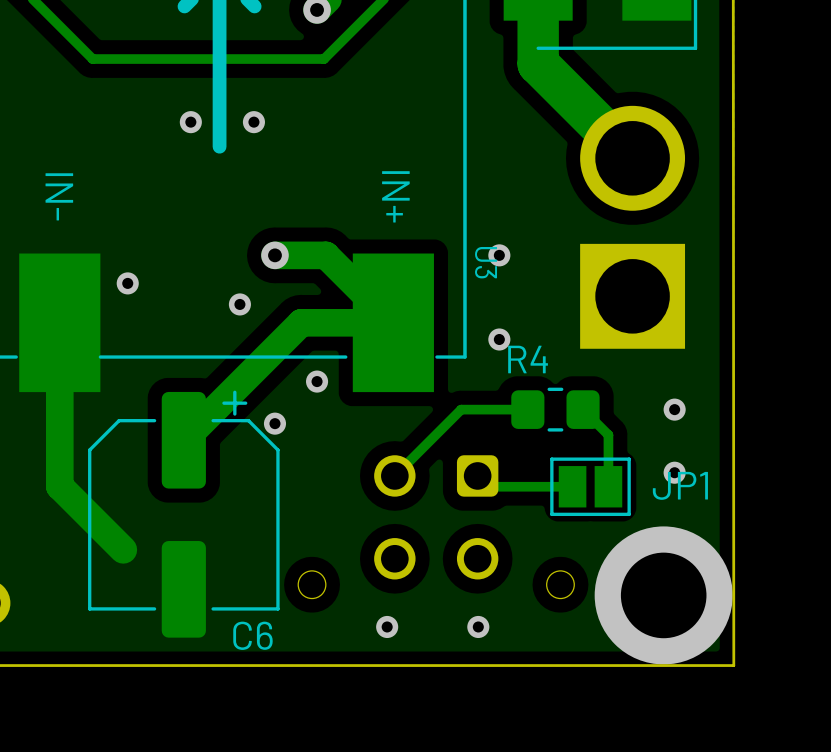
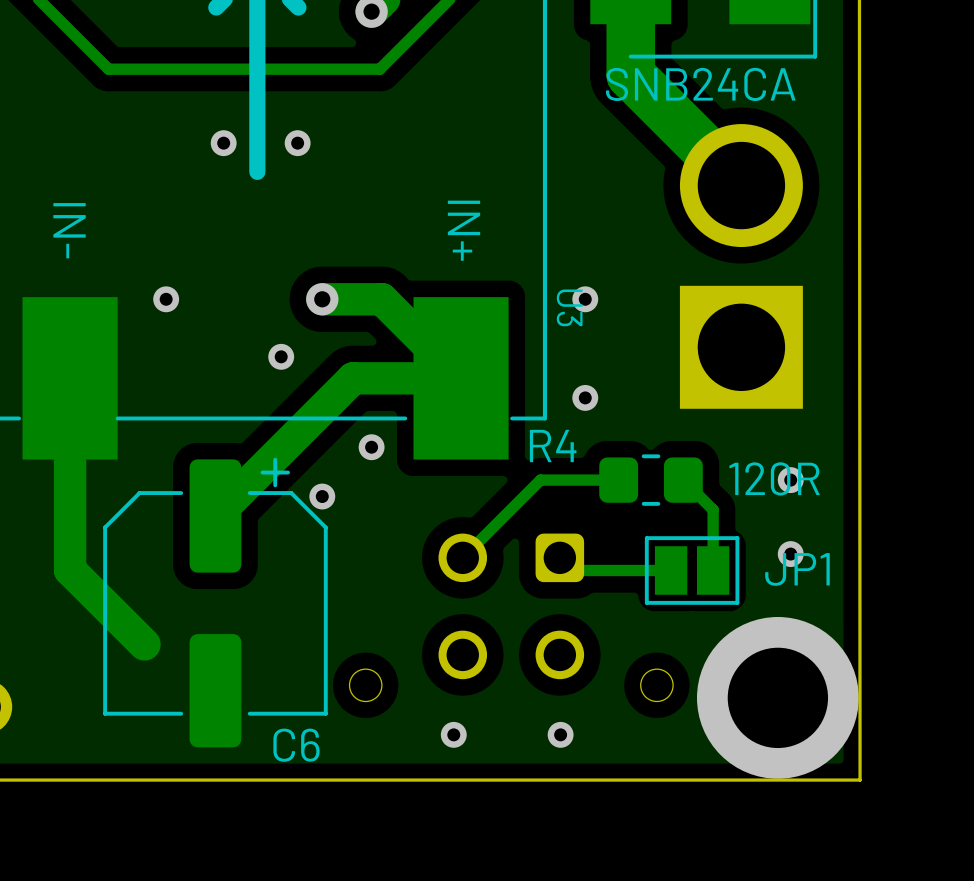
text: none -> SNB24CA (700, 84)
via position: (127, 283) -> (166, 299)
R4 name position: R4 (528, 359) -> R4 (553, 446)
text: none -> 120R (774, 478)

